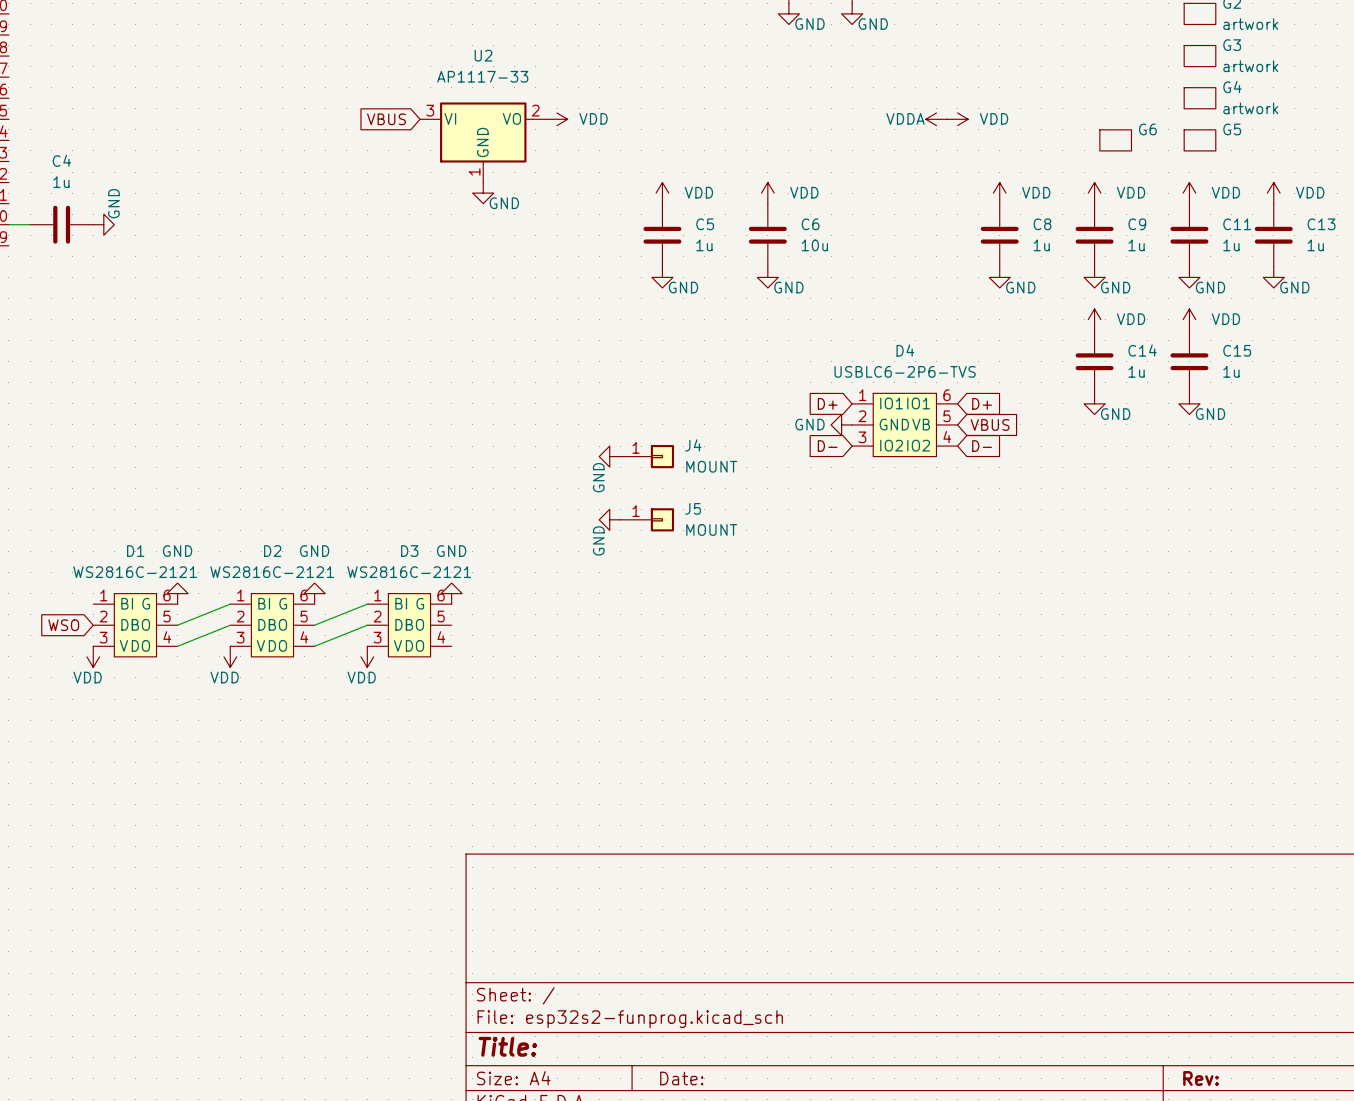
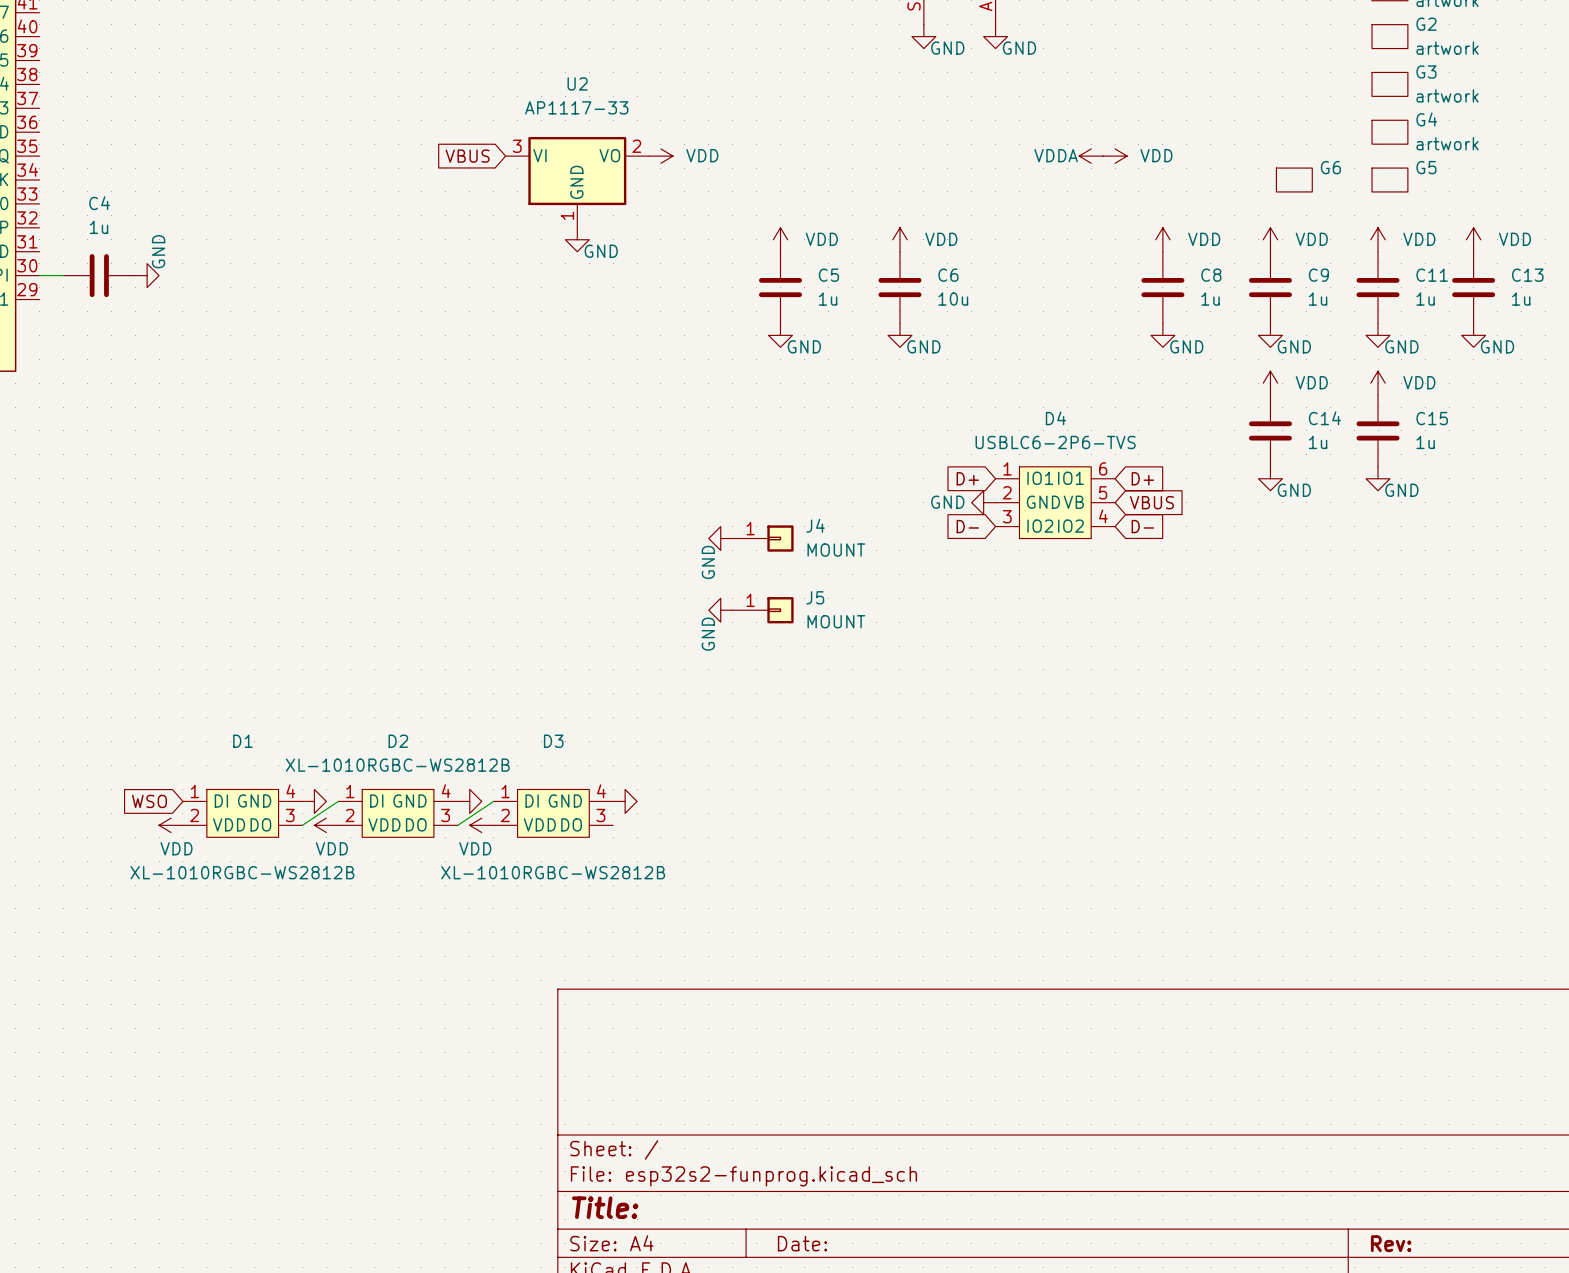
D1 value: WS2816C-2121 (135, 572) -> XL-1010RGBC-WS2812B (242, 872)
D2 value: WS2816C-2121 (272, 572) -> XL-1010RGBC-WS2812B (397, 765)
D3 value: WS2816C-2121 (409, 572) -> XL-1010RGBC-WS2812B (553, 872)
D1 symbol: [93, 593, 178, 657] -> [182, 789, 303, 838]
power symbol: GND (177, 593) -> none
D2 symbol: [230, 593, 315, 657] -> [338, 789, 458, 838]
power symbol: GND (314, 593) -> none
D3 symbol: [367, 593, 452, 657] -> [493, 789, 614, 838]
power symbol: GND (451, 593) -> none
wire: (230, 604) (177, 625) -> none
wire: (367, 604) (314, 625) -> none
global label position: WSO (63, 625) -> WSO (149, 801)
wire: (230, 625) (177, 646) -> none
wire: (367, 625) (314, 646) -> none
power symbol: VDD (93, 656) -> none
power symbol: VDD (230, 656) -> none
power symbol: VDD (367, 656) -> none
power symbol: none -> (314, 801)
wire: none -> (338, 801) (302, 825)
power symbol: none -> (469, 801)
wire: none -> (493, 801) (457, 825)
power symbol: none -> (625, 801)
power symbol: none -> VDD (171, 825)
power symbol: none -> VDD (326, 825)
power symbol: none -> VDD (481, 825)

